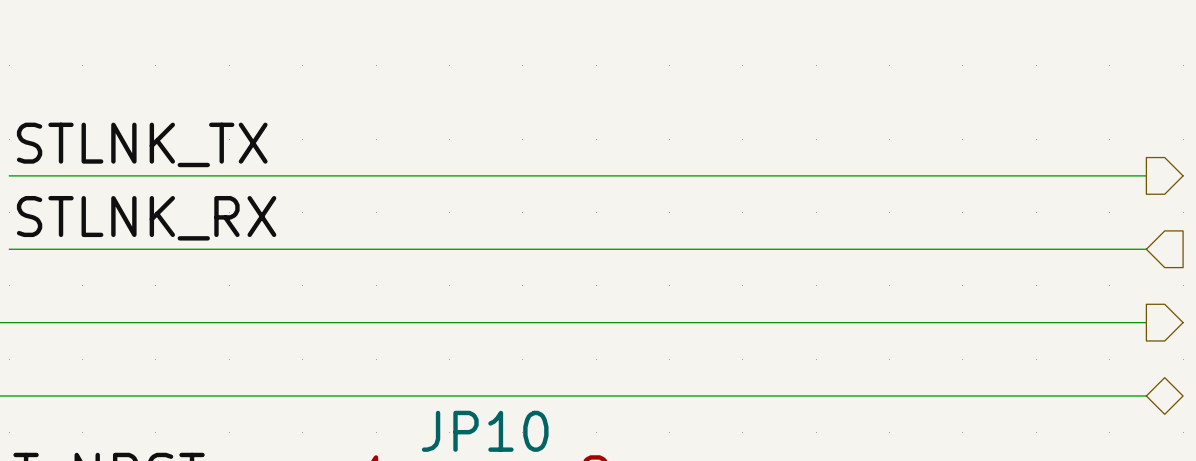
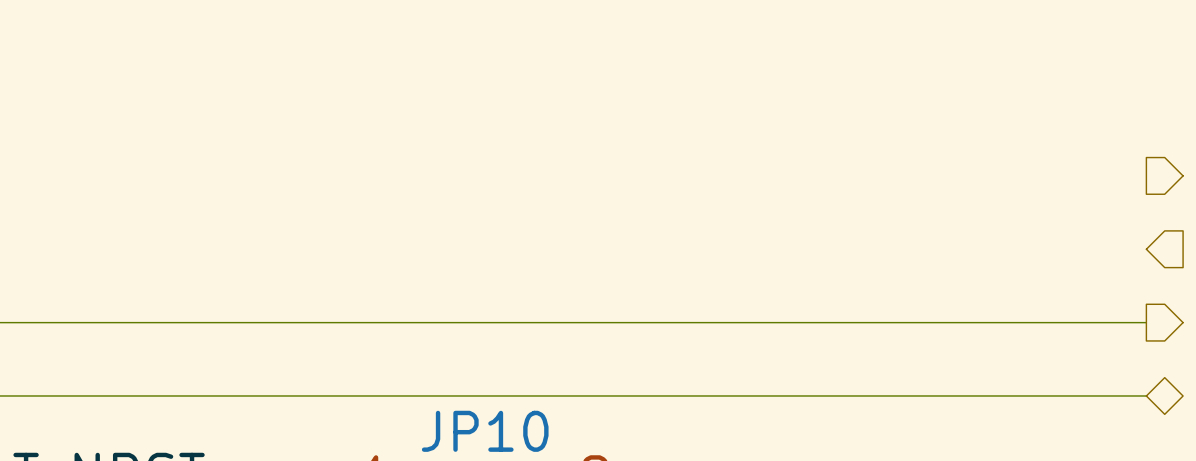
label: STLNK_TX (142, 144) -> none
wire: (9, 175) (1146, 175) -> none
label: STLNK_RX (146, 218) -> none
wire: (9, 249) (1146, 249) -> none

